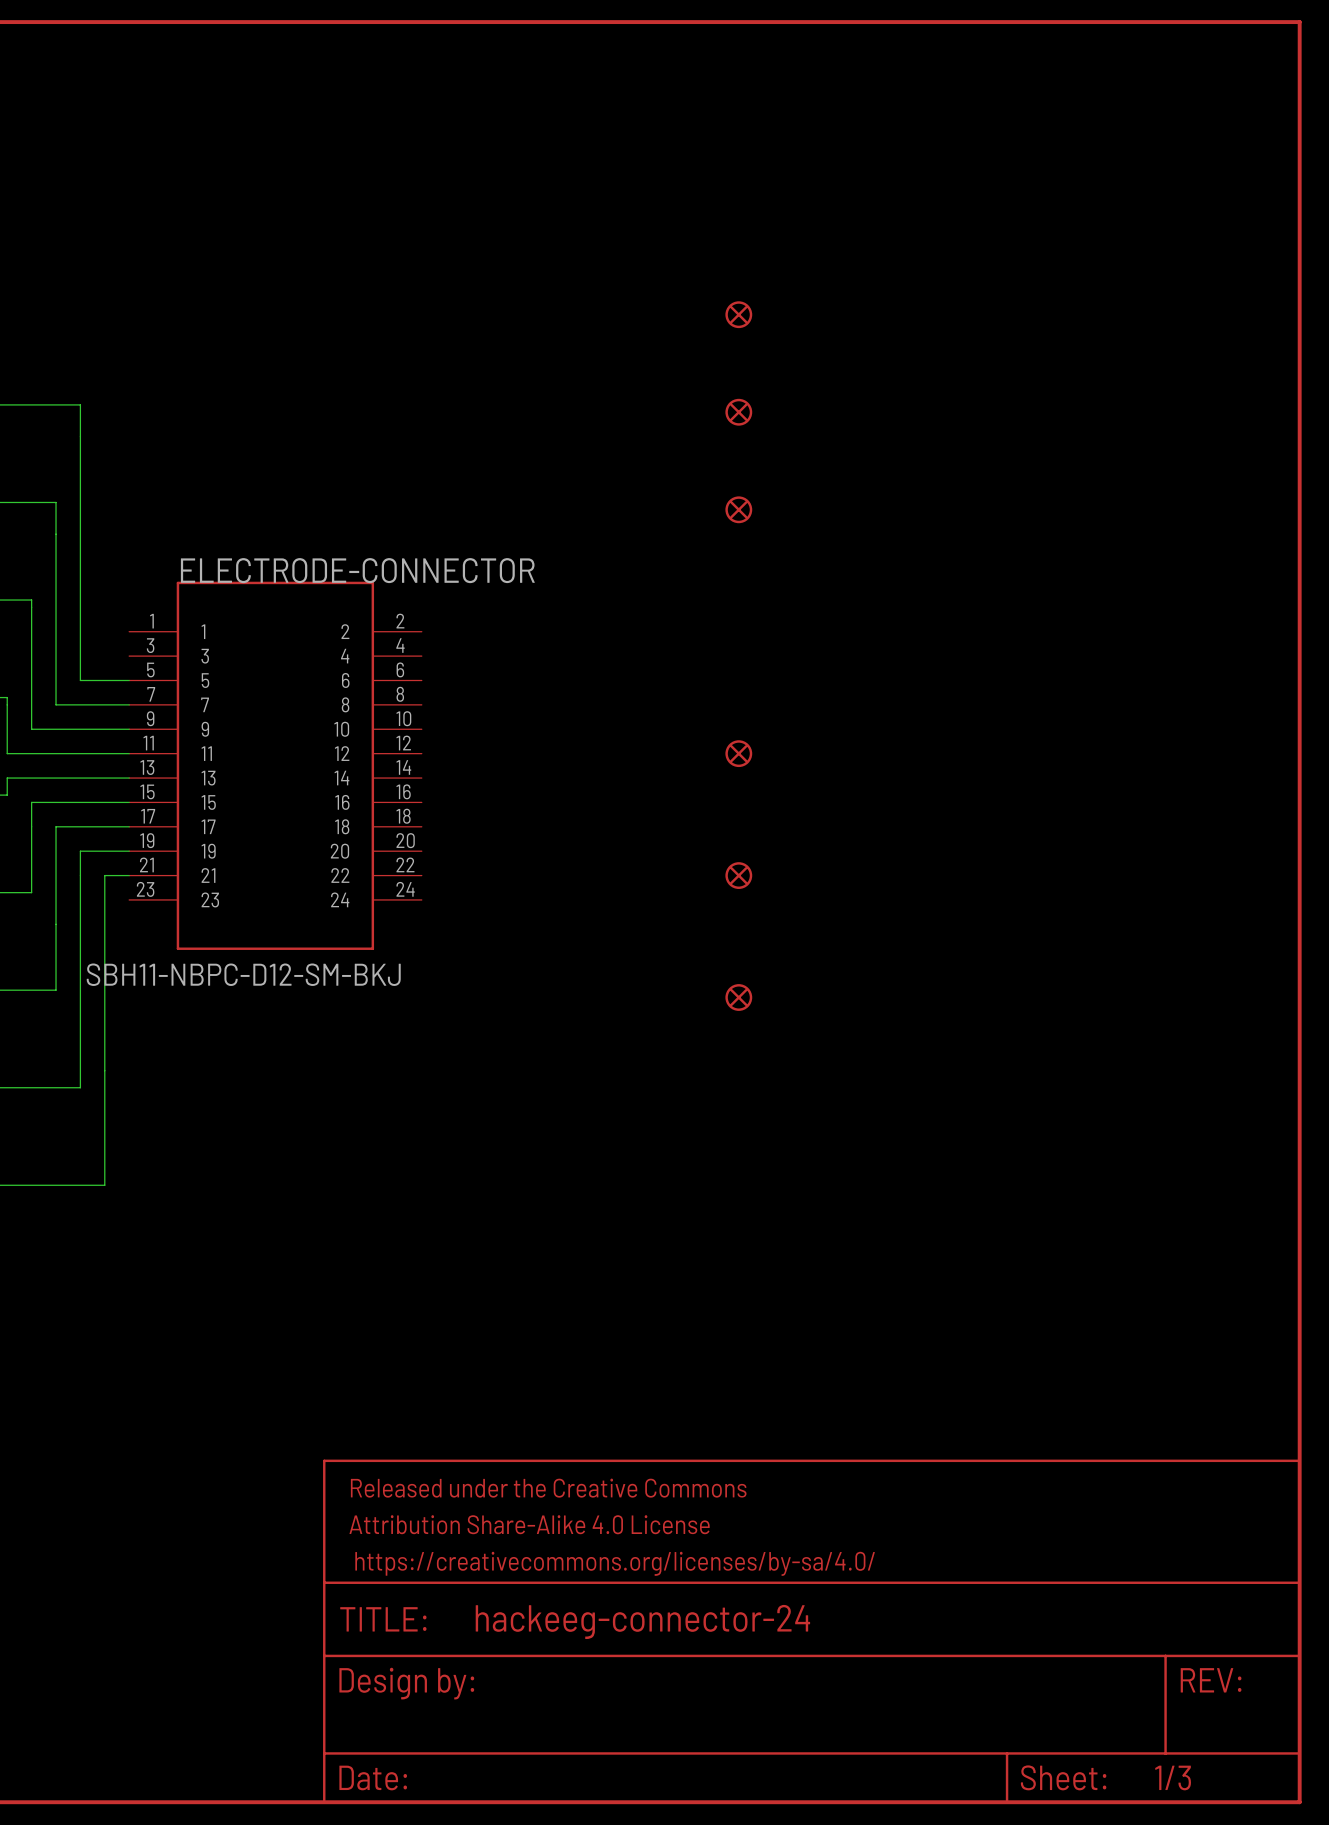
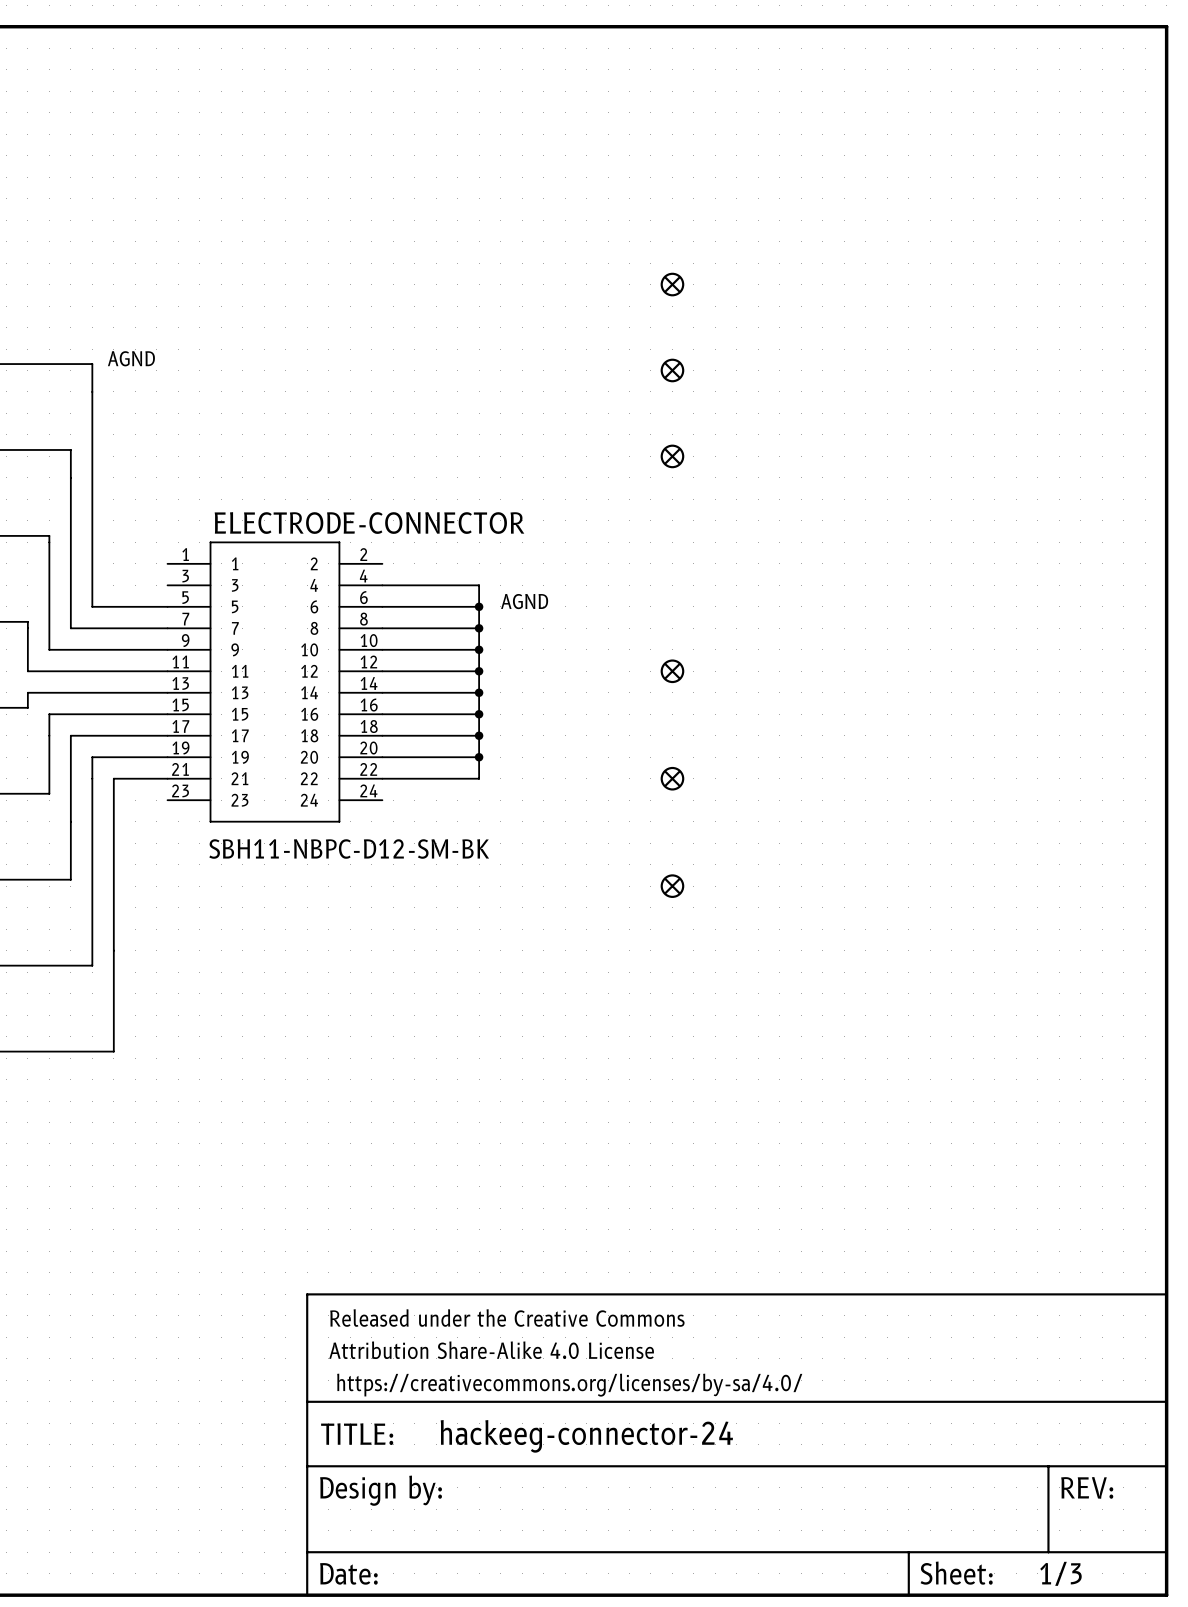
label: none -> AGND (131, 358)
wire: none -> (382, 585) (479, 585) (479, 778) (382, 778)
label: none -> AGND (524, 601)
wire: none -> (382, 606) (479, 606)
junction: none -> (479, 606)
wire: none -> (382, 628) (479, 628)
junction: none -> (479, 628)
wire: none -> (382, 649) (479, 649)
junction: none -> (479, 649)
wire: none -> (382, 671) (479, 671)
junction: none -> (479, 671)
ELECTRODE-CONNECTOR: SBH11-NBPC-D12-SM-BKJ (275, 765) -> none
ELECTRODE-CONNECTOR: none -> SBH11-NBPC-D12-SM-BK (274, 682)
wire: none -> (382, 692) (479, 692)
junction: none -> (479, 692)
wire: none -> (382, 714) (479, 714)
junction: none -> (479, 714)
wire: none -> (382, 735) (479, 735)
junction: none -> (479, 735)
wire: none -> (382, 757) (479, 757)
junction: none -> (479, 757)

